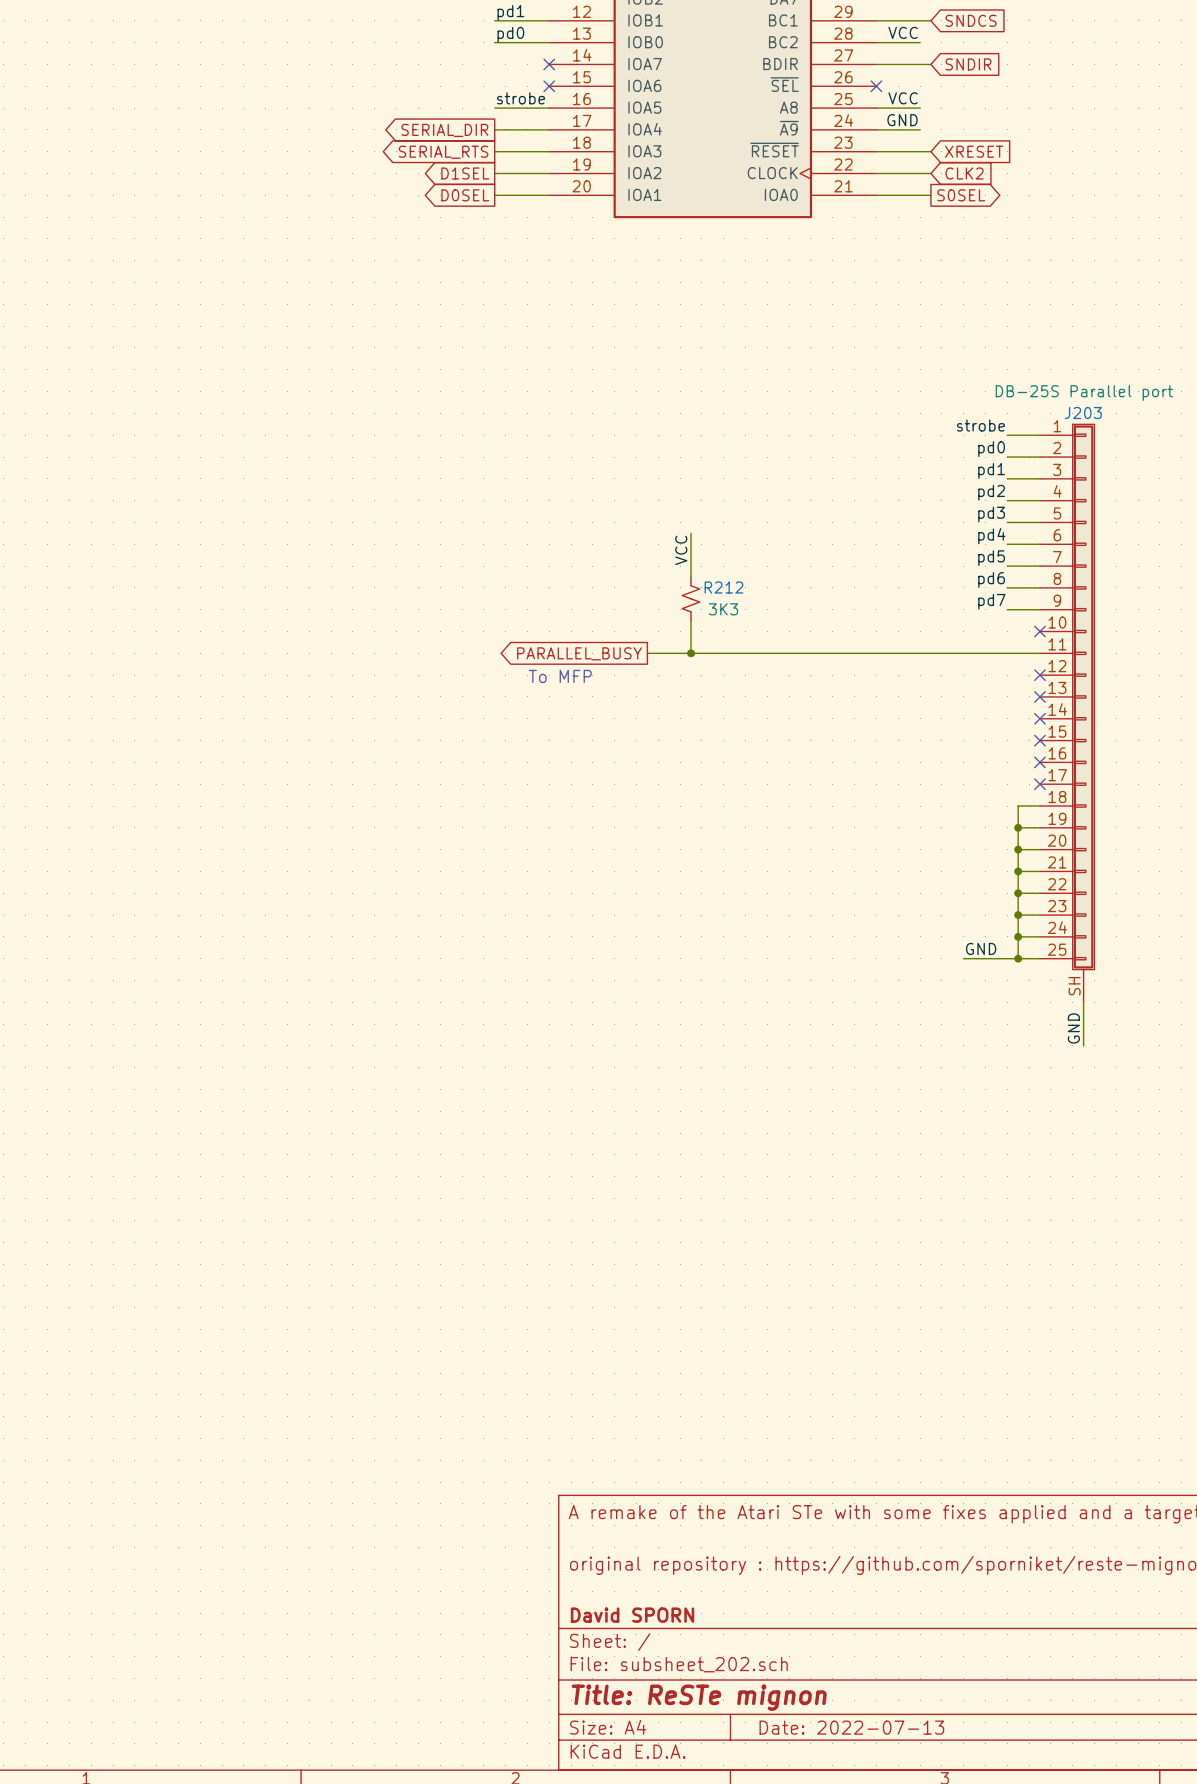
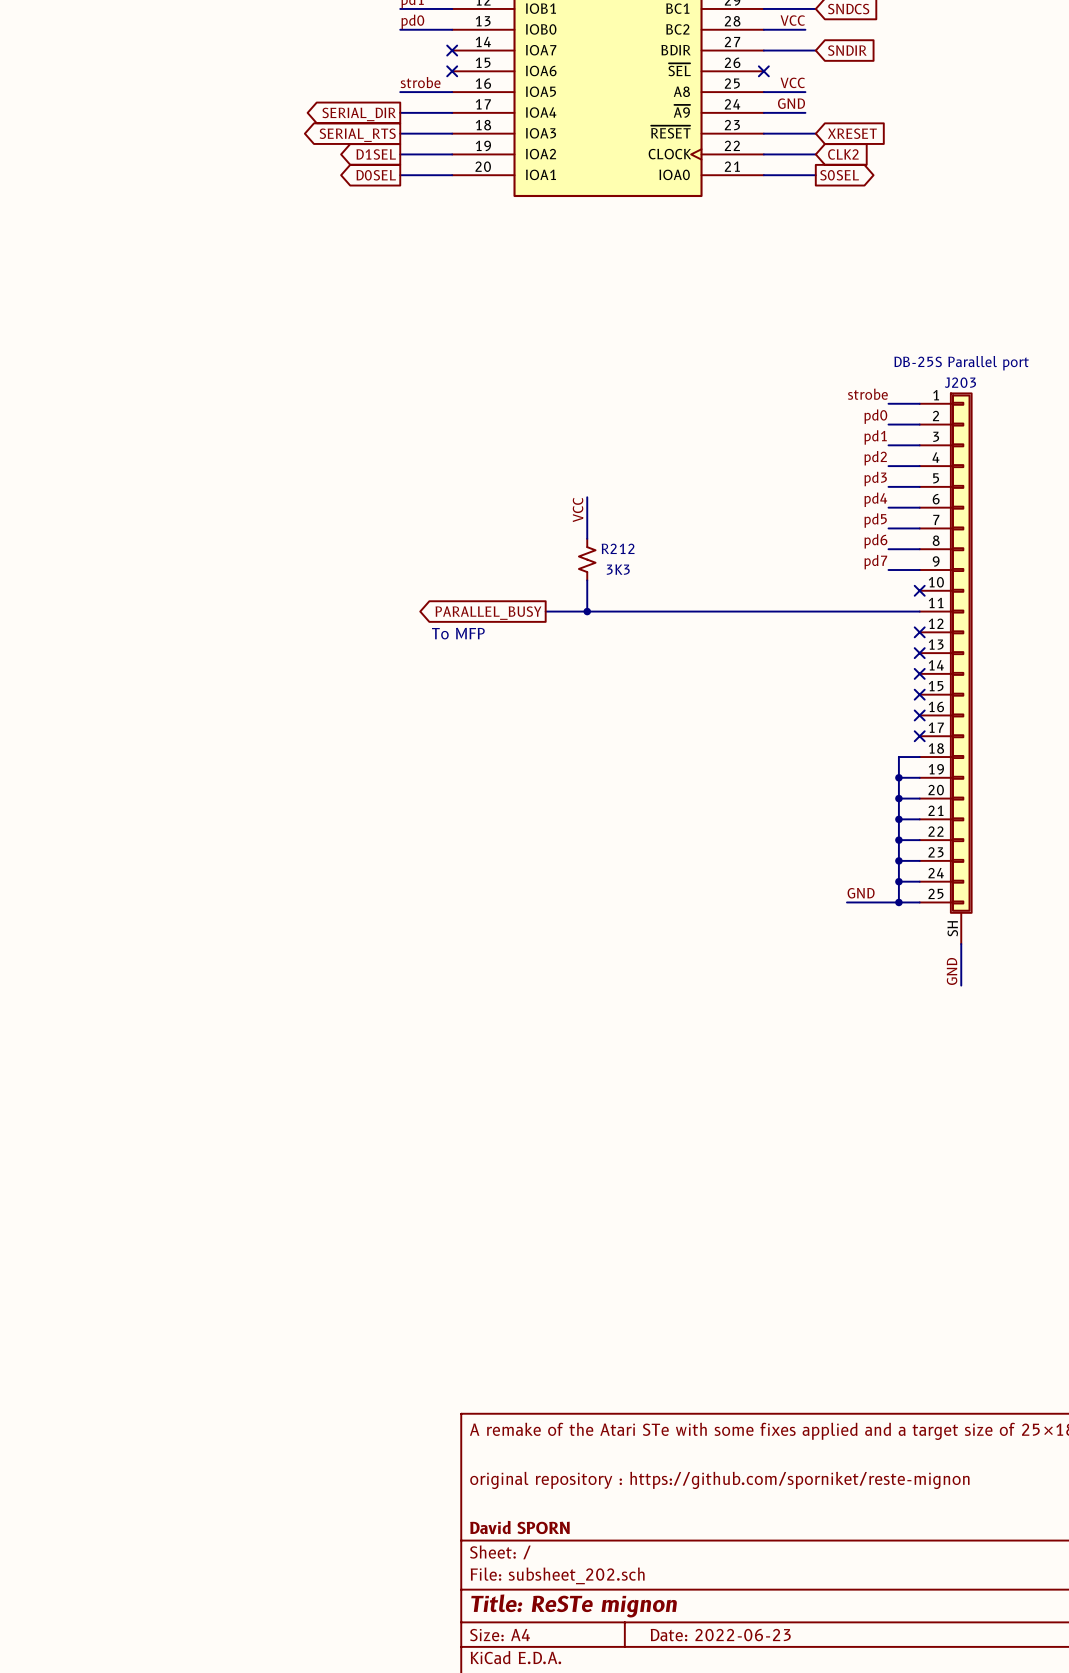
title block: Date: 2022-07-13 (851, 1727) -> Date: 2022-06-23 (720, 1635)

